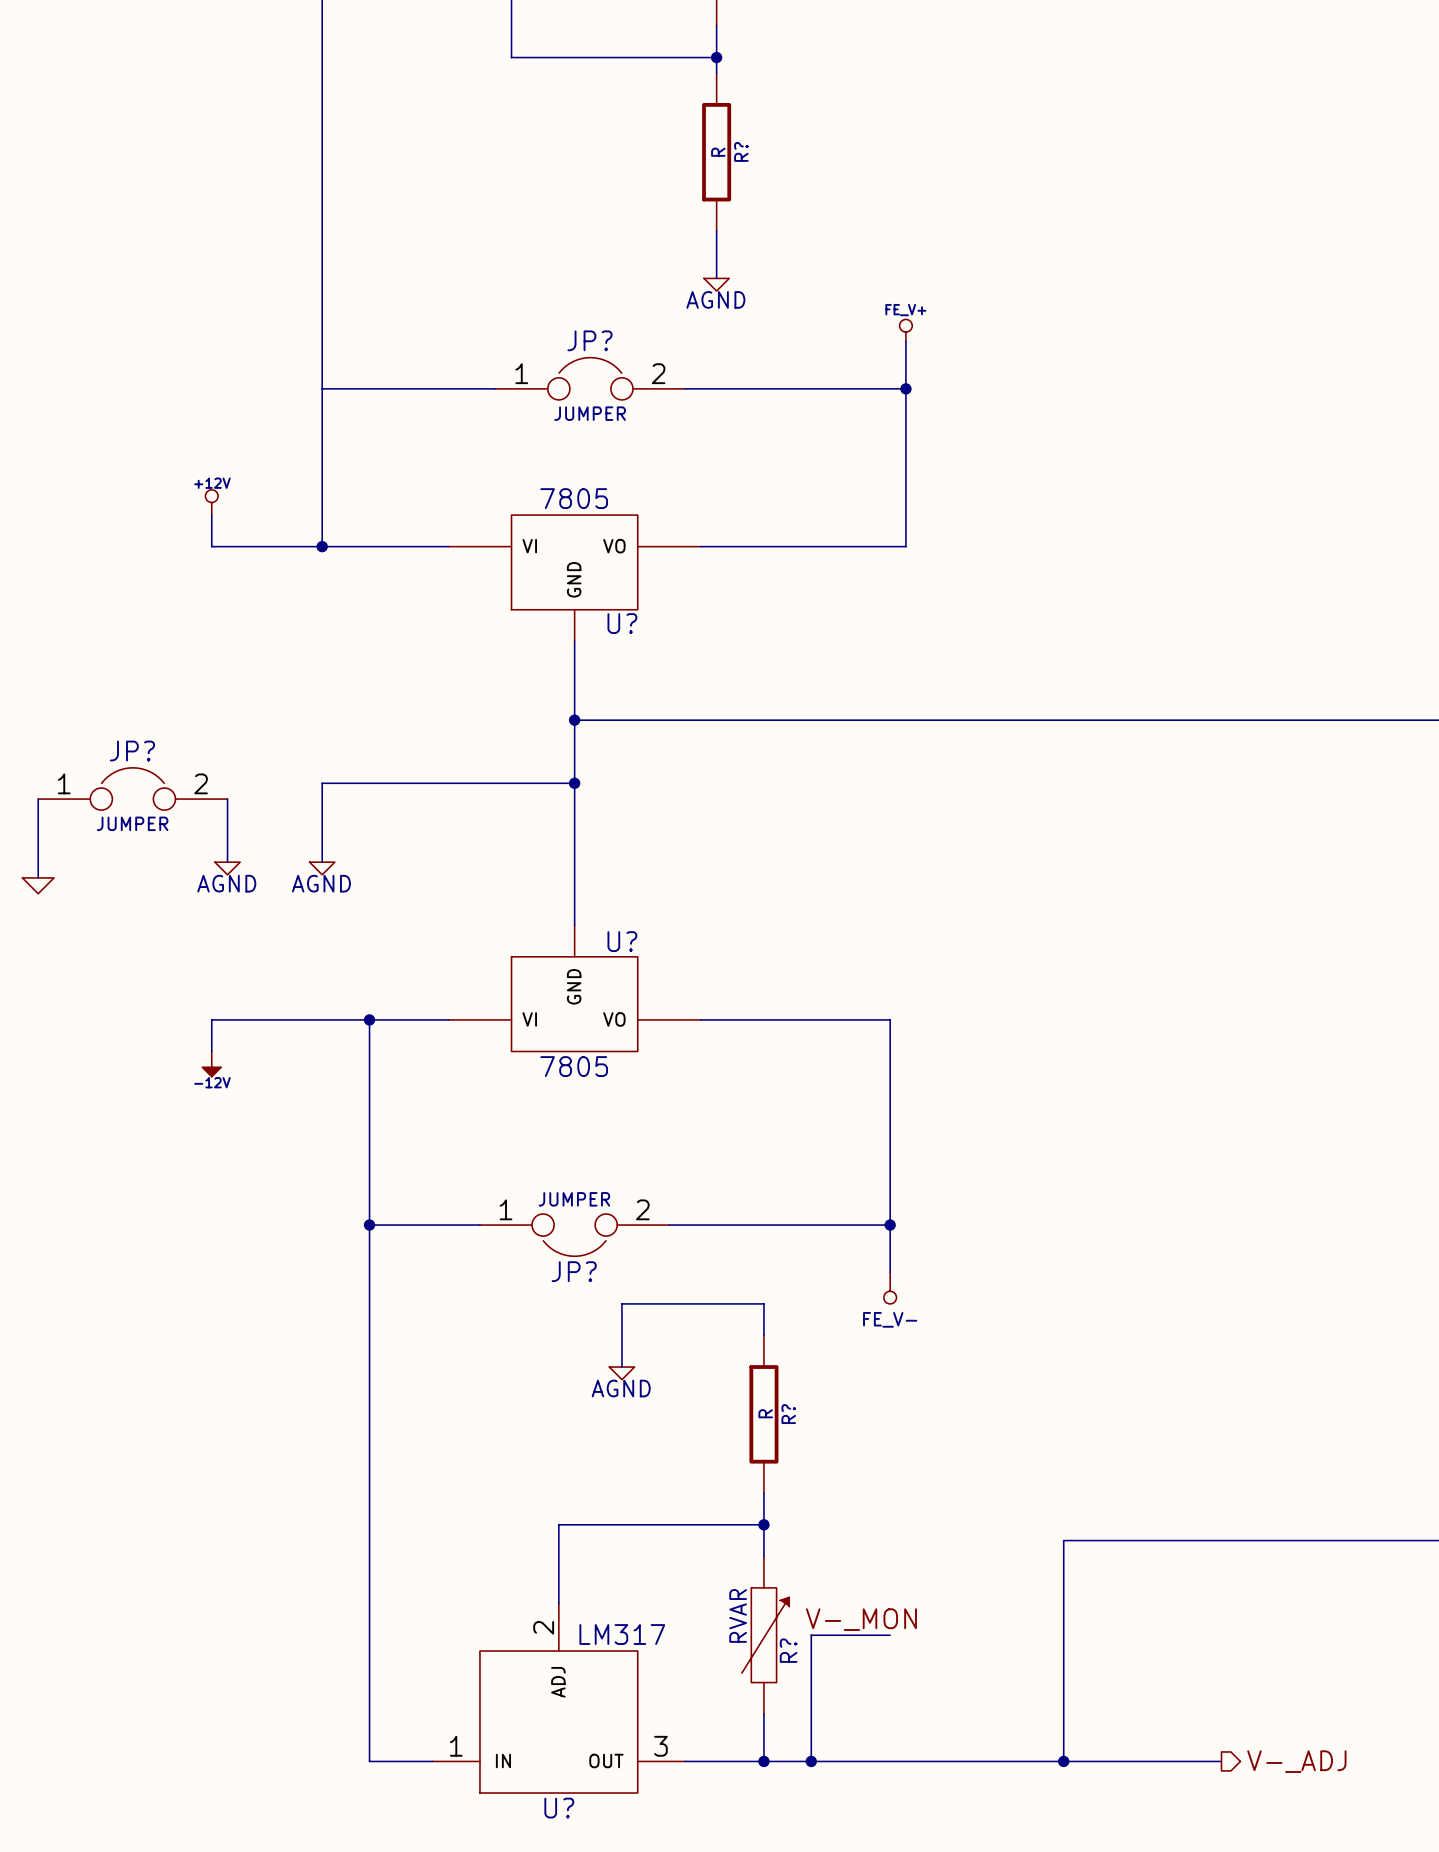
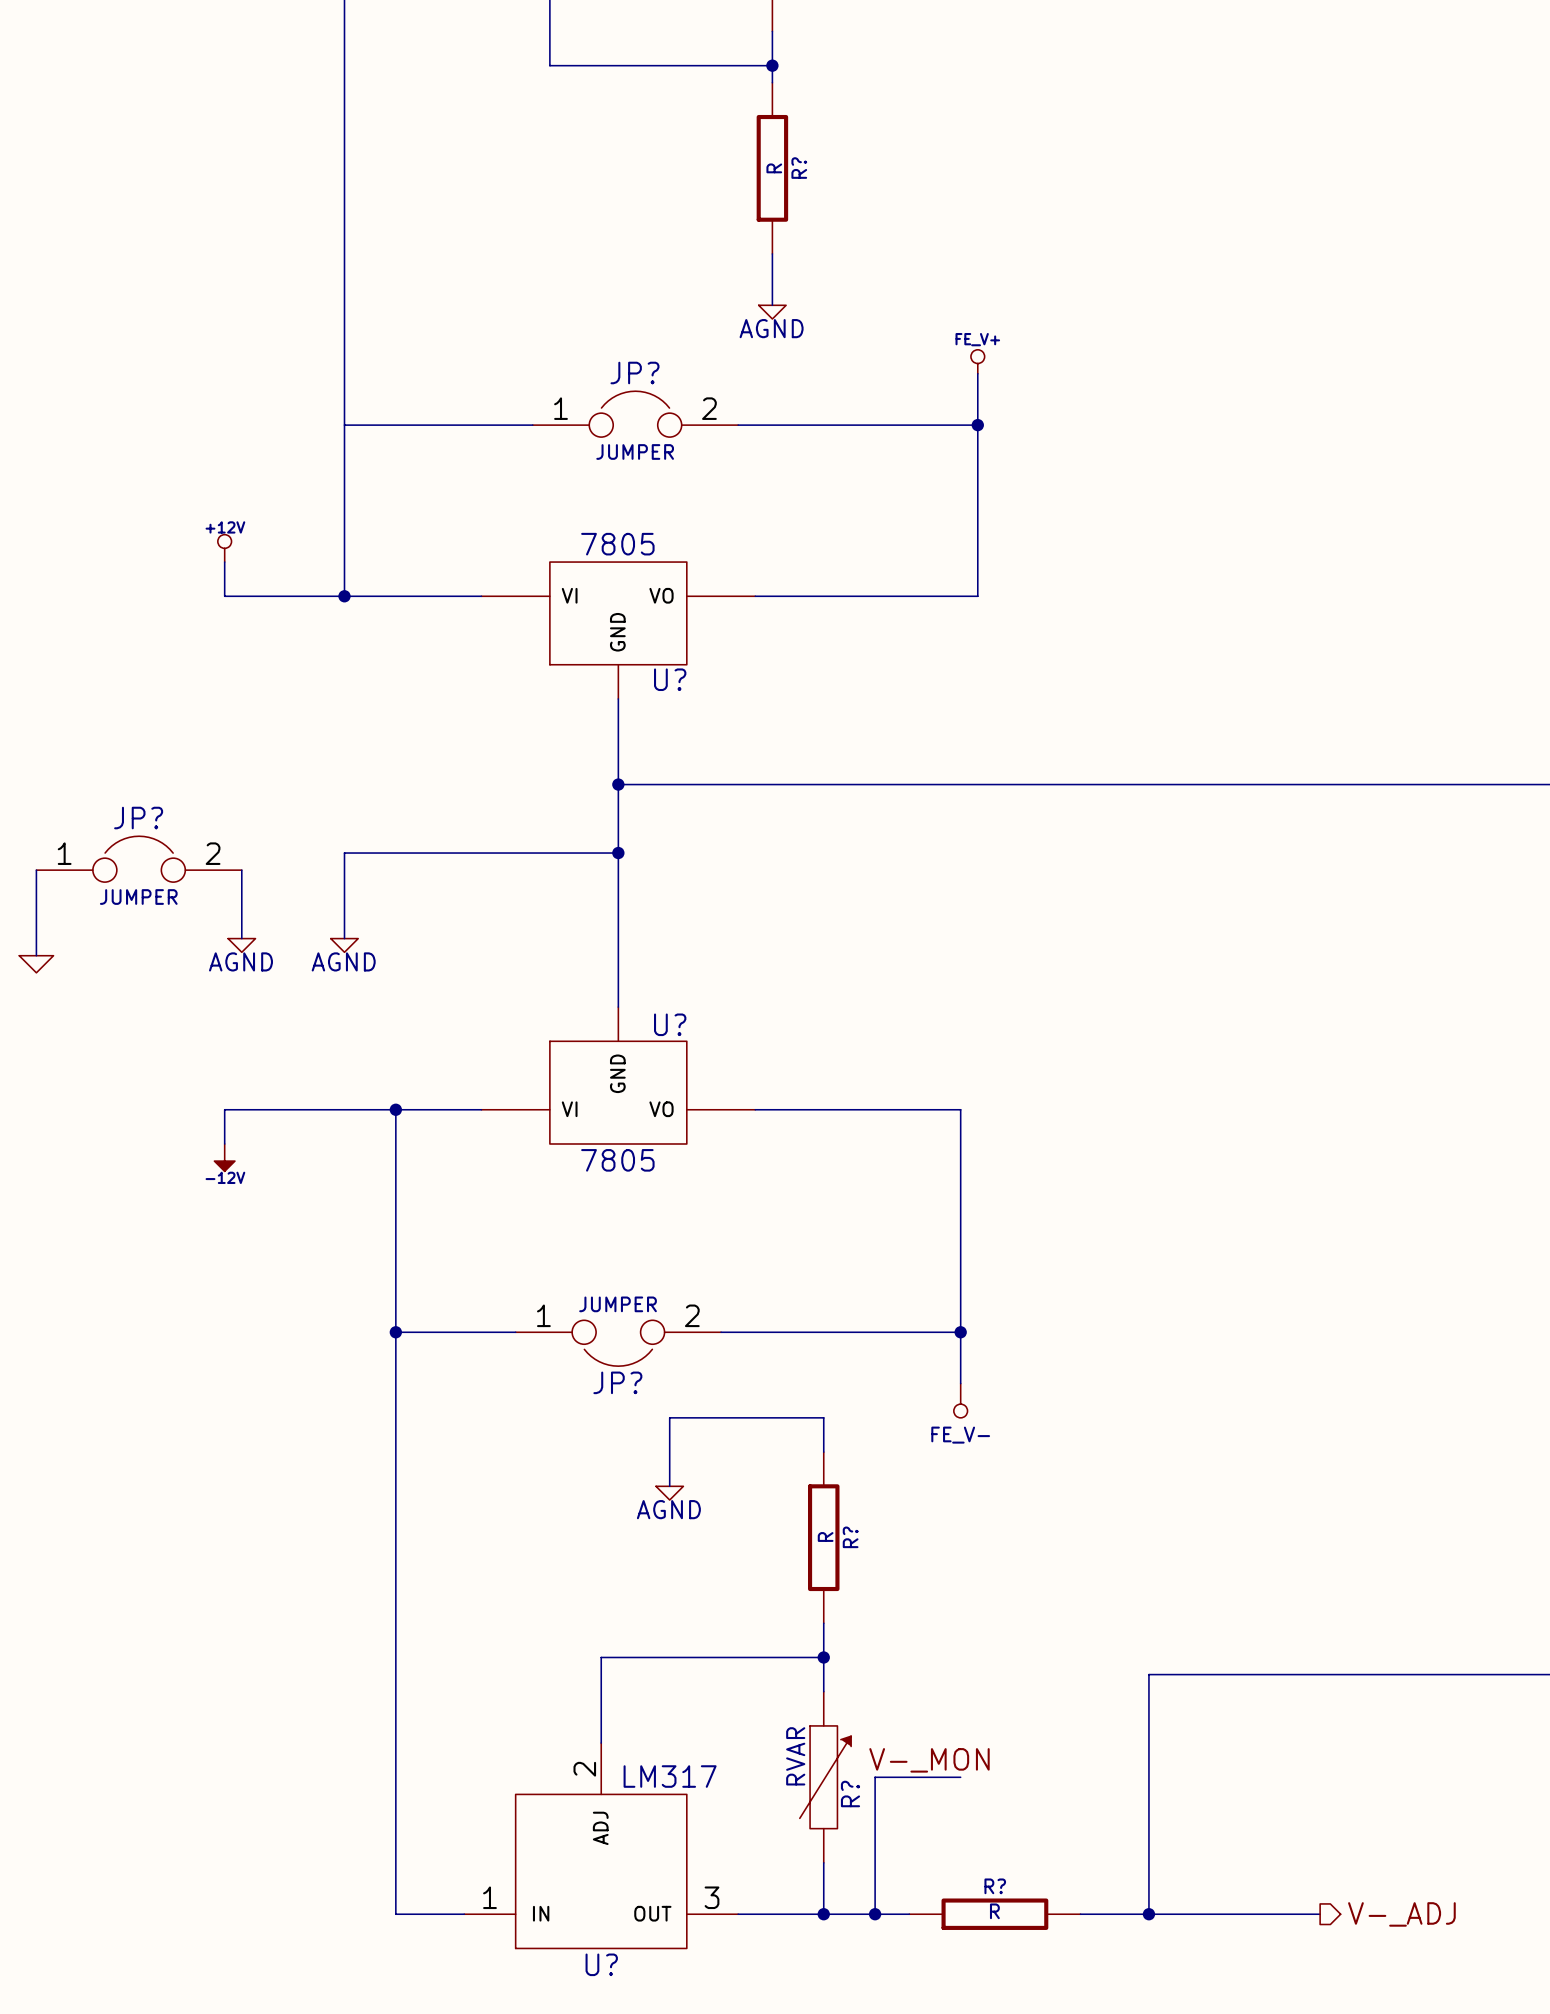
wire: (842, 1761) (1000, 1761) -> none
R?: none -> R (994, 1914)

